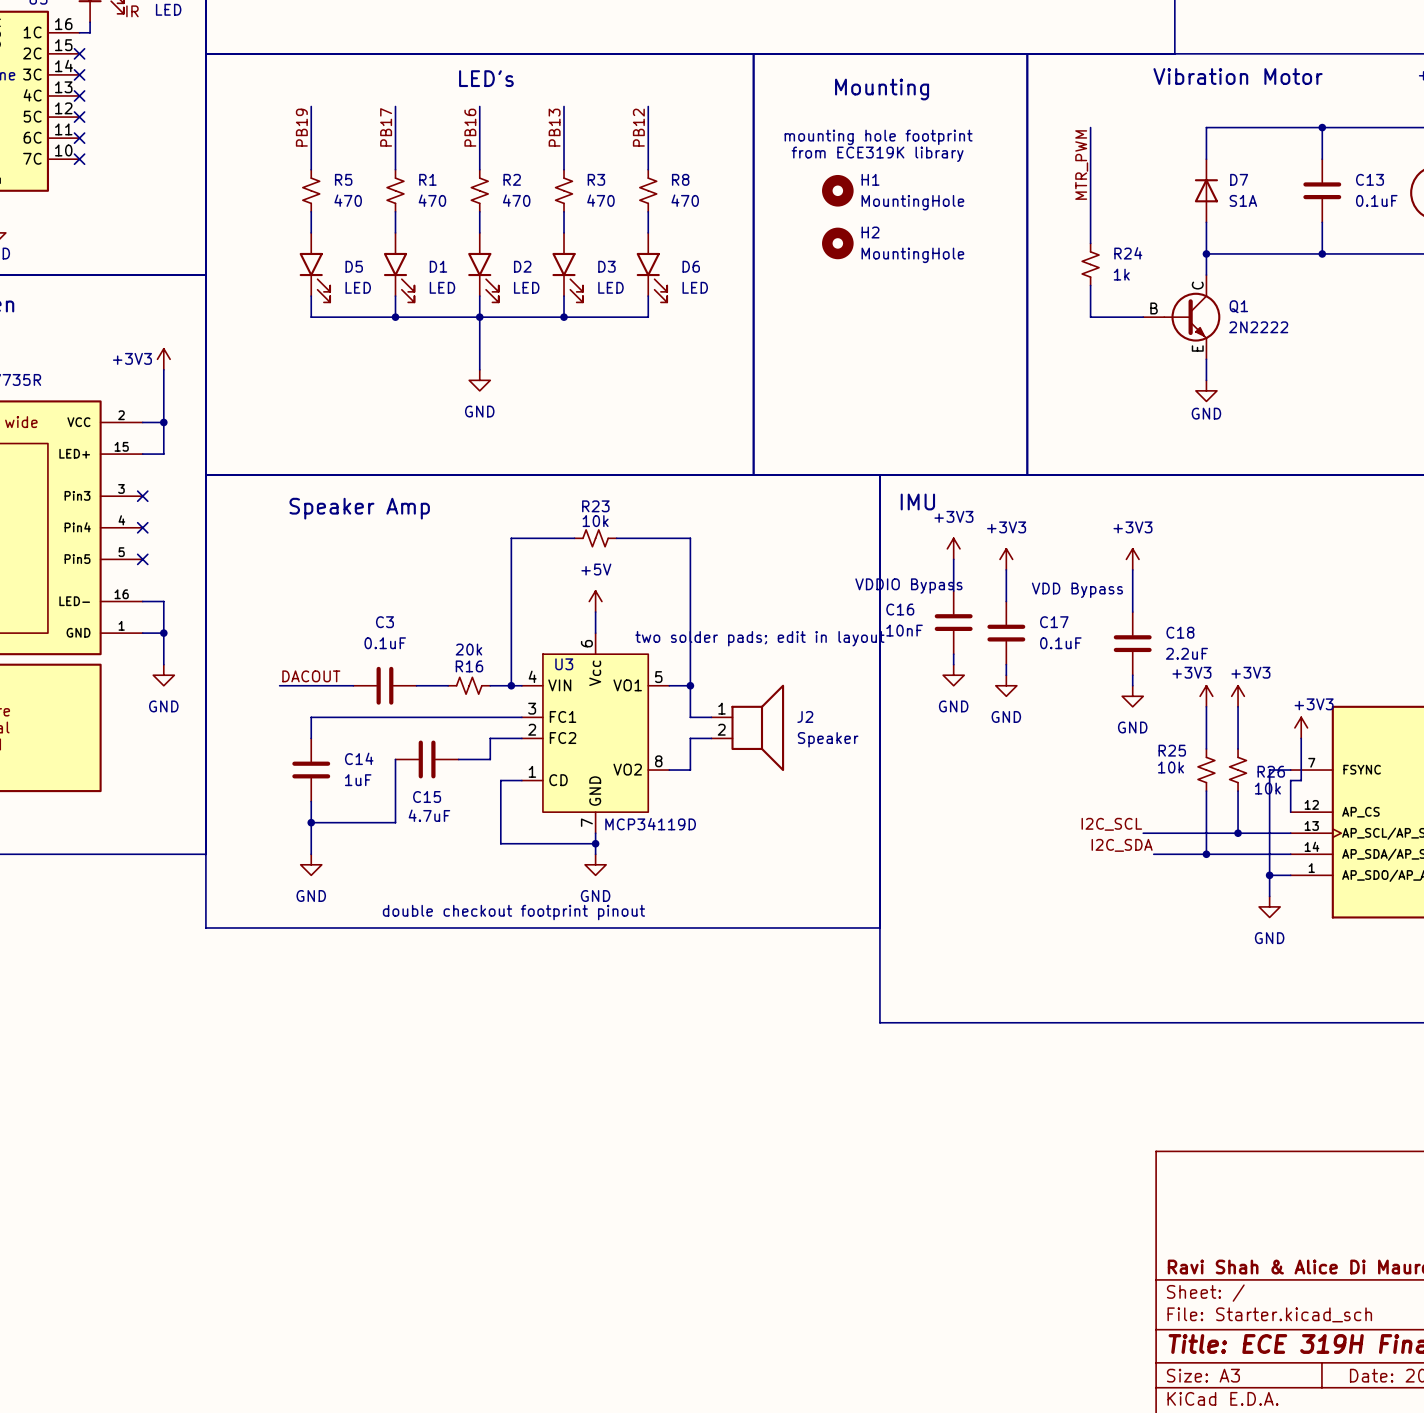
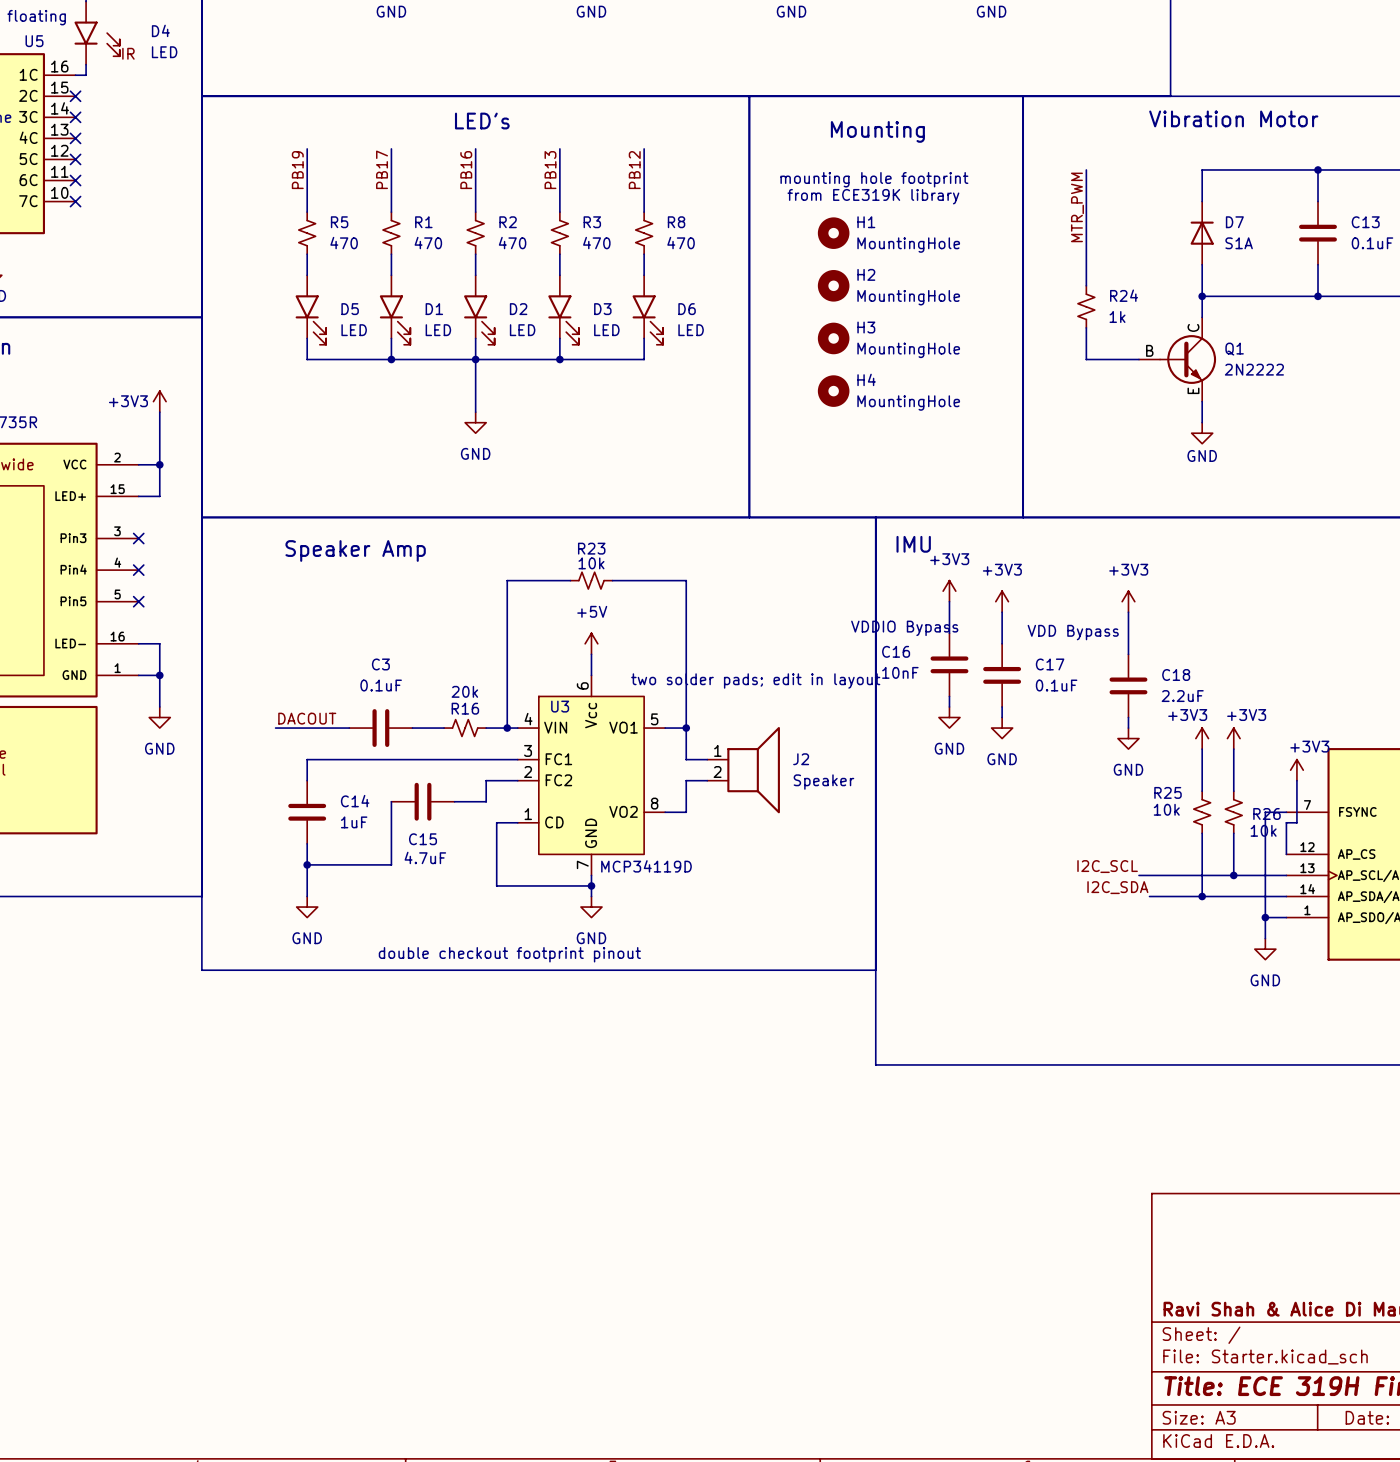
H3: none -> MountingHole (833, 338)
H4: none -> MountingHole (833, 391)

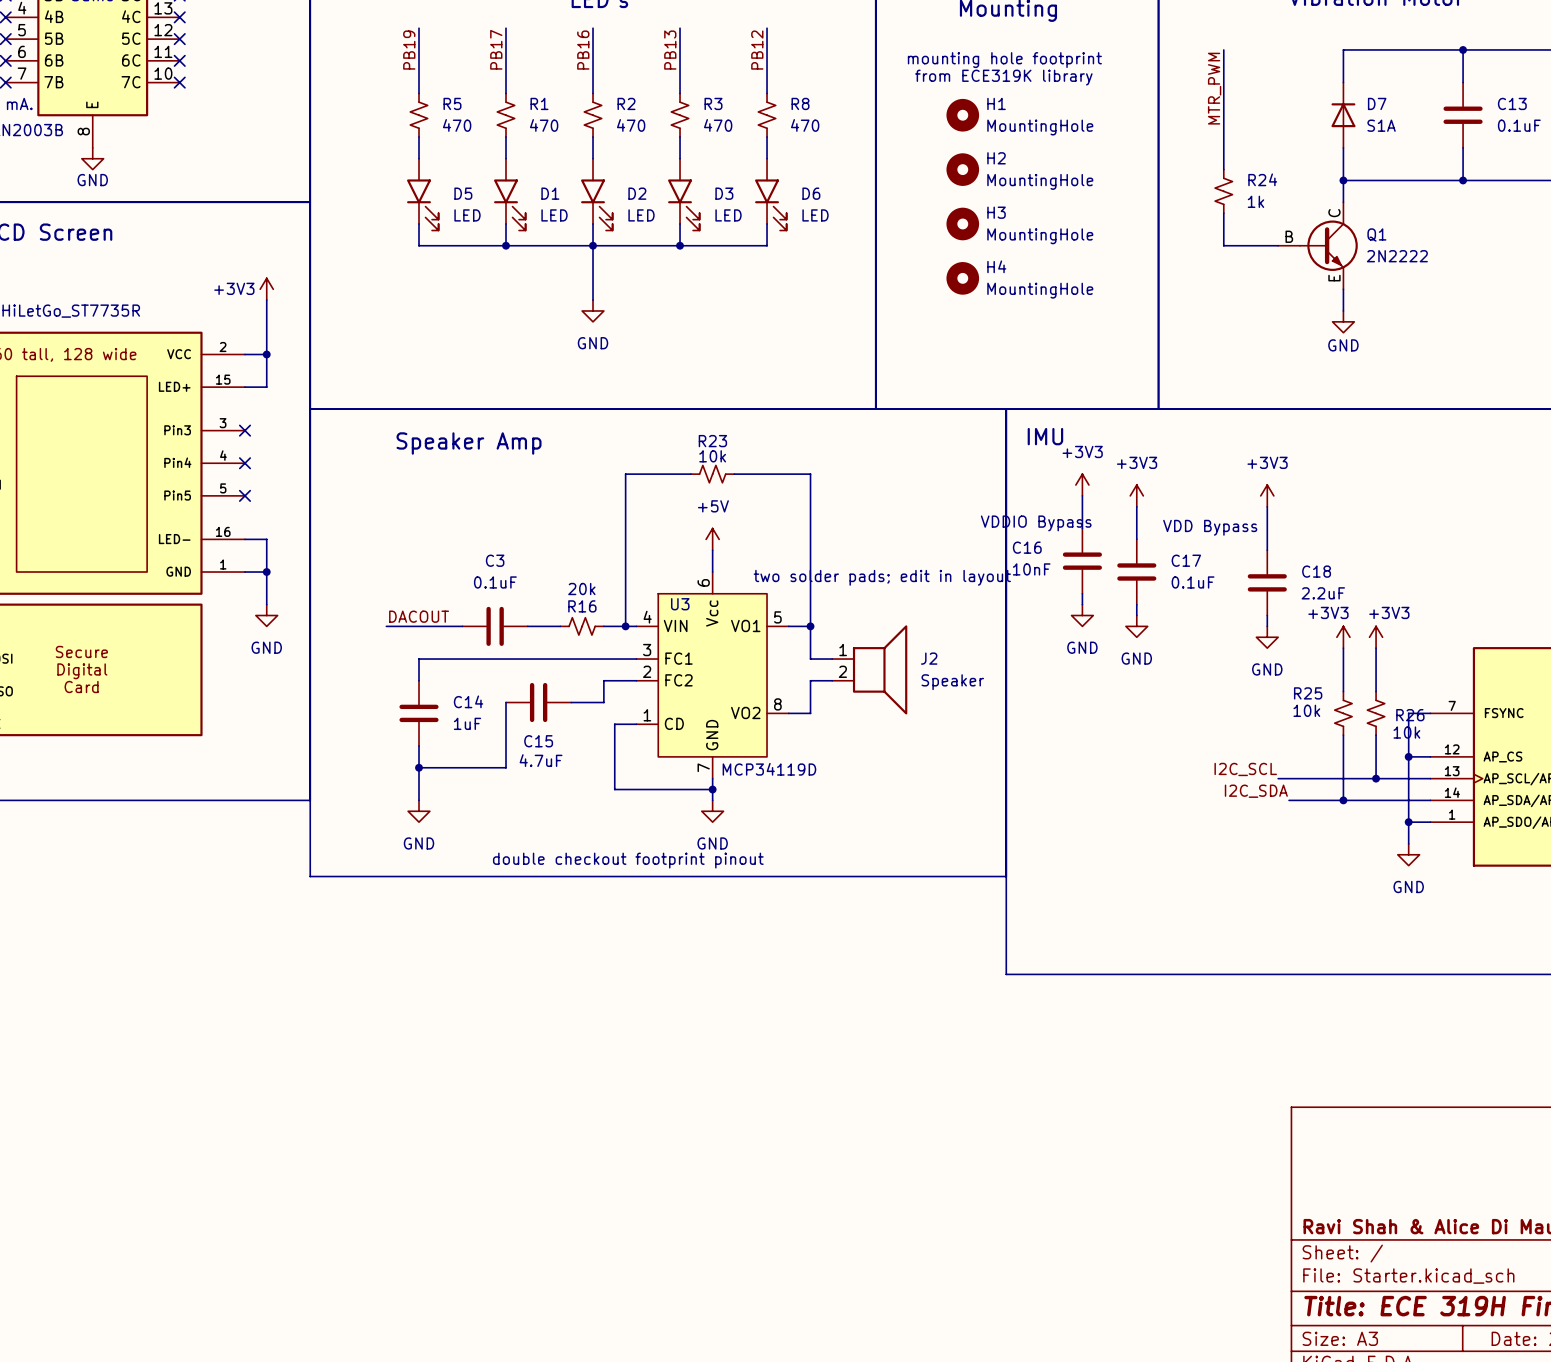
power symbol: +3V3 (1296, 770) -> none
wire: (1296, 780) (1296, 822) (1286, 822) (1286, 854) -> (1408, 756) (1430, 756)
junction: none -> (1408, 756)

